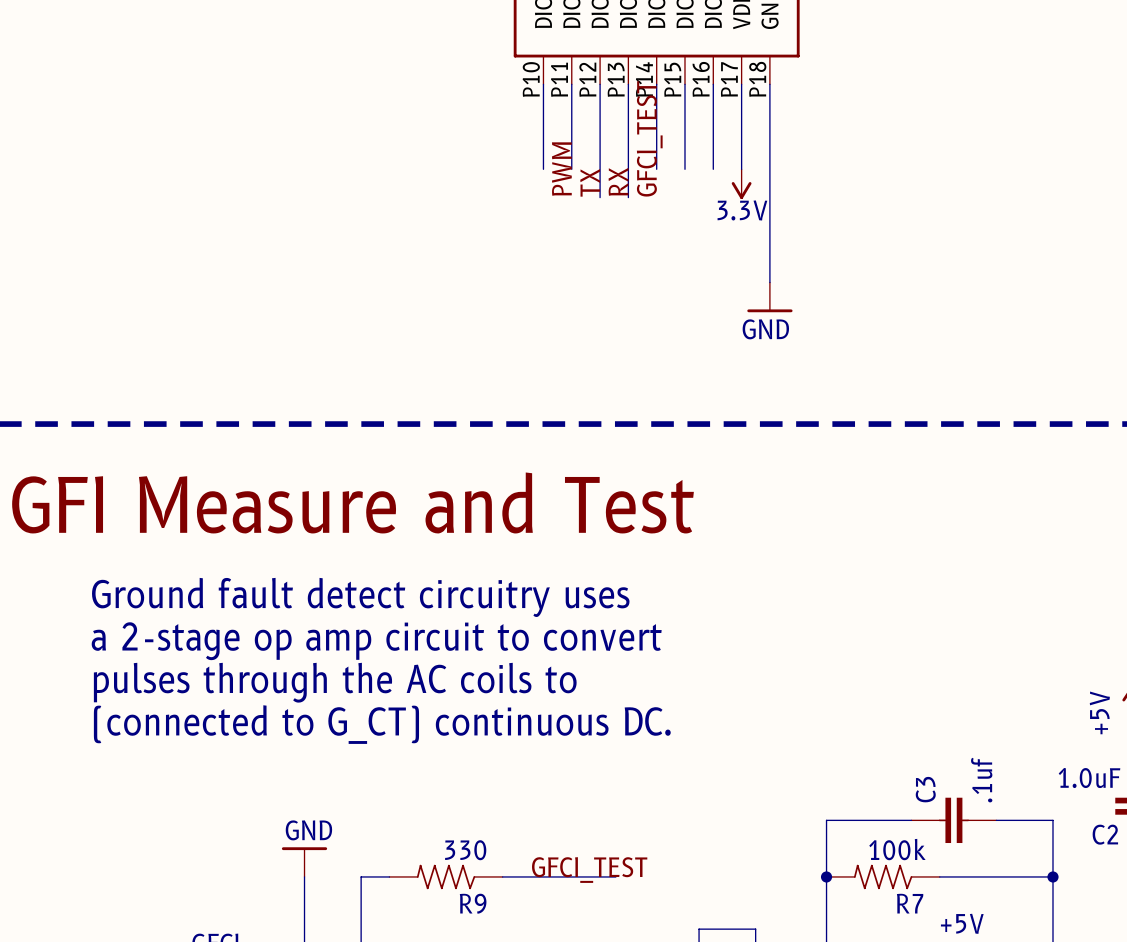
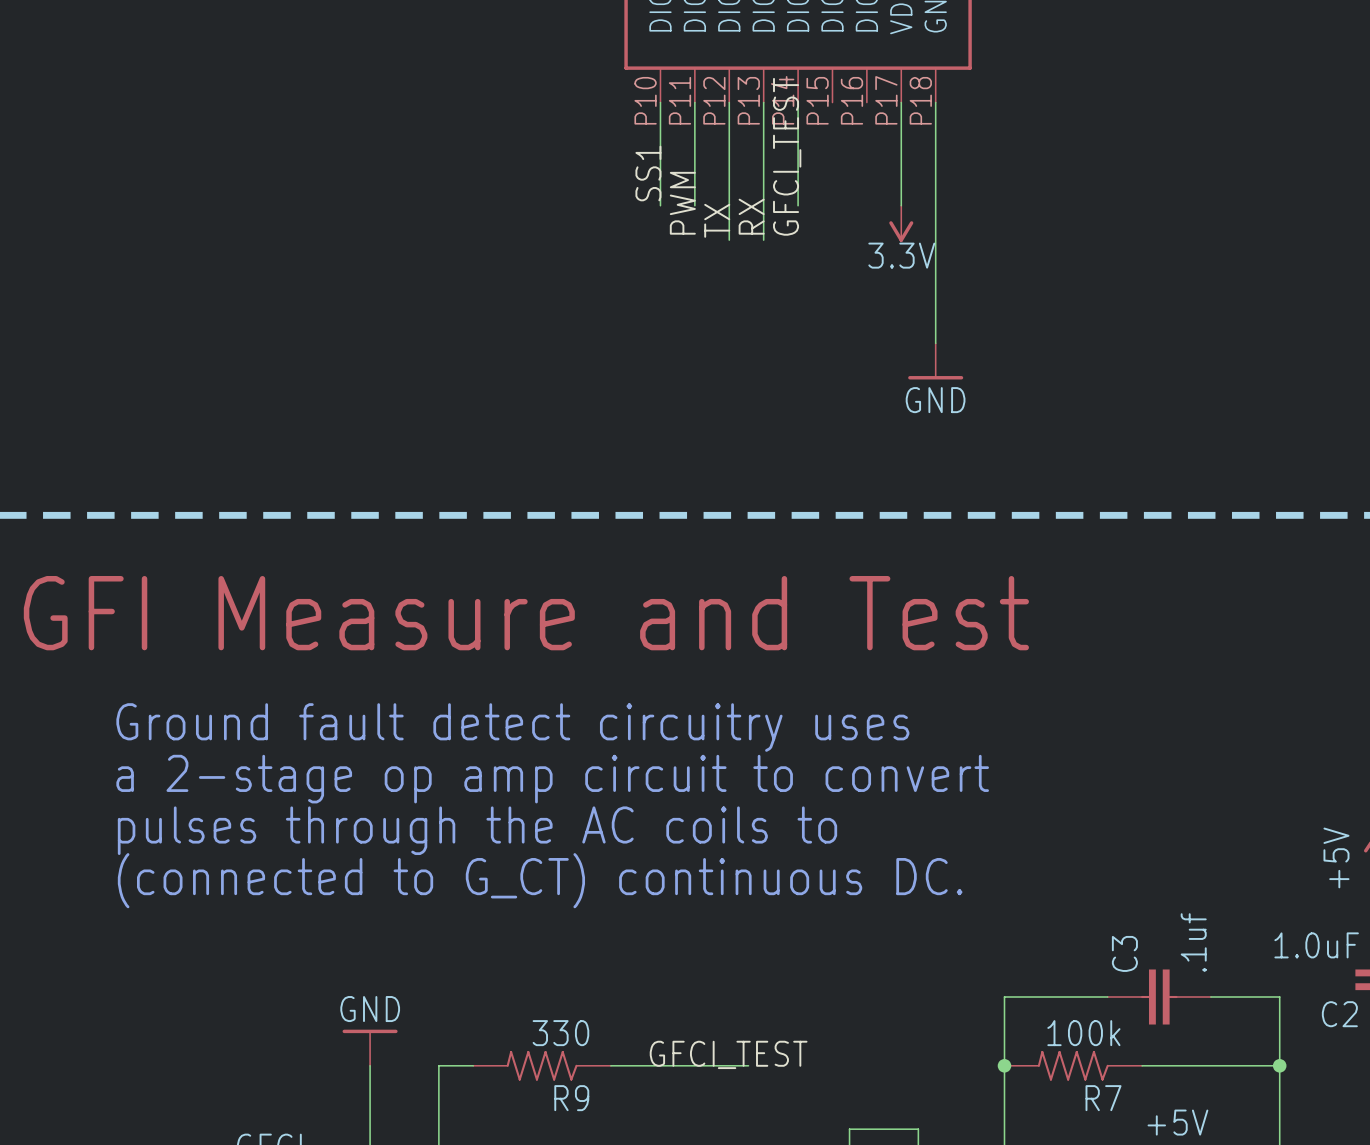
wire: (684, 84) (684, 169) -> none
wire: (713, 84) (713, 169) -> none
label: none -> SS1 (648, 173)

